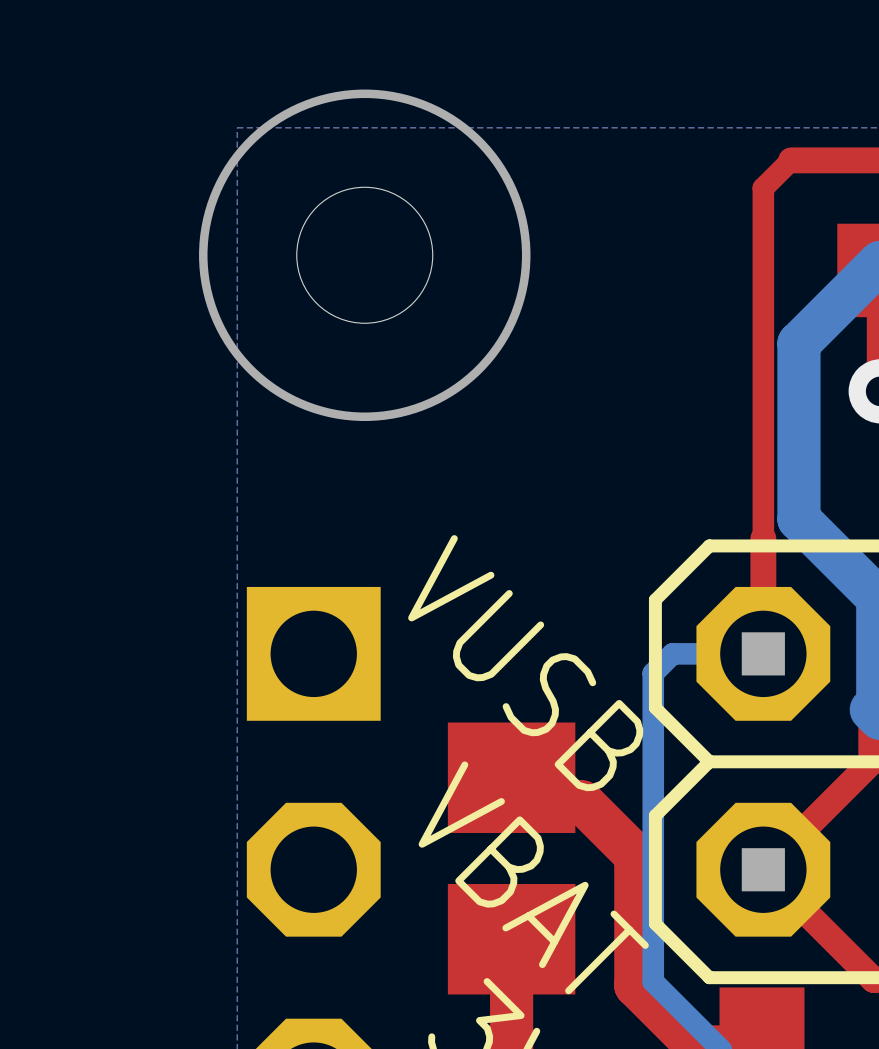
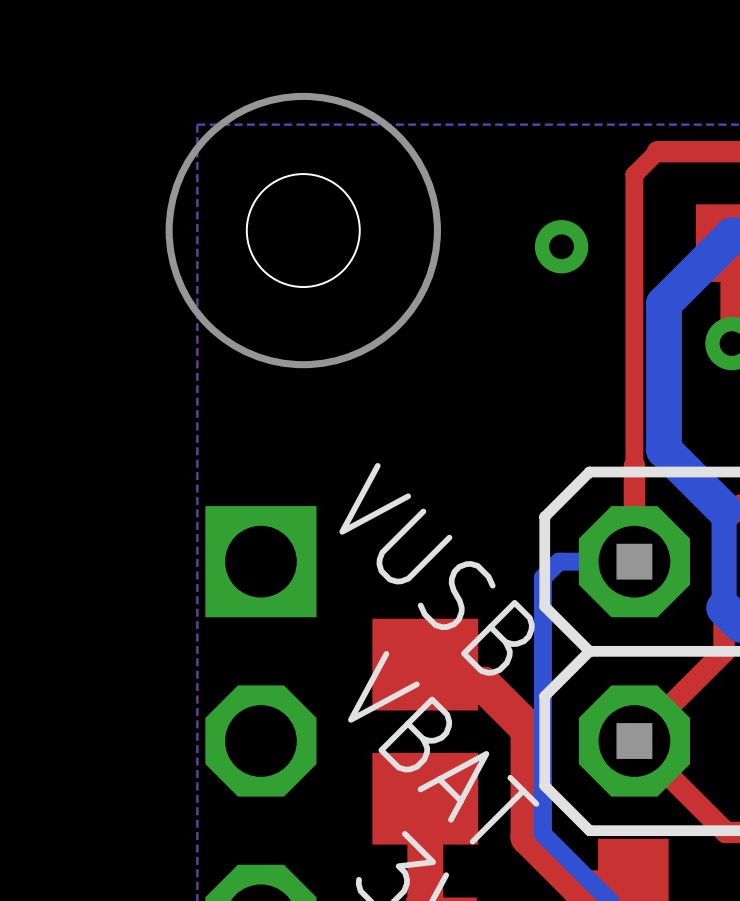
via: none -> (561, 246)

